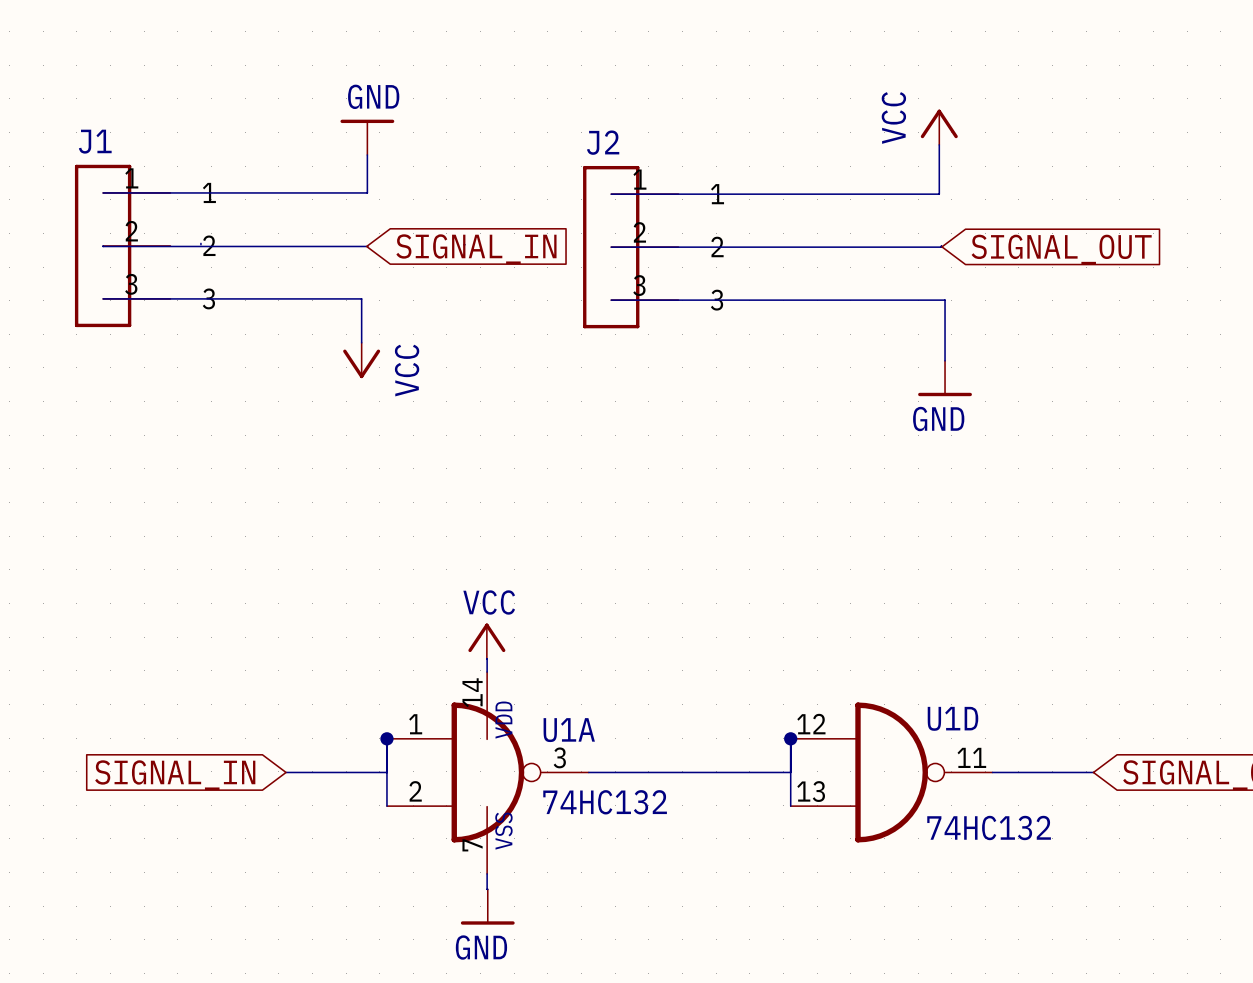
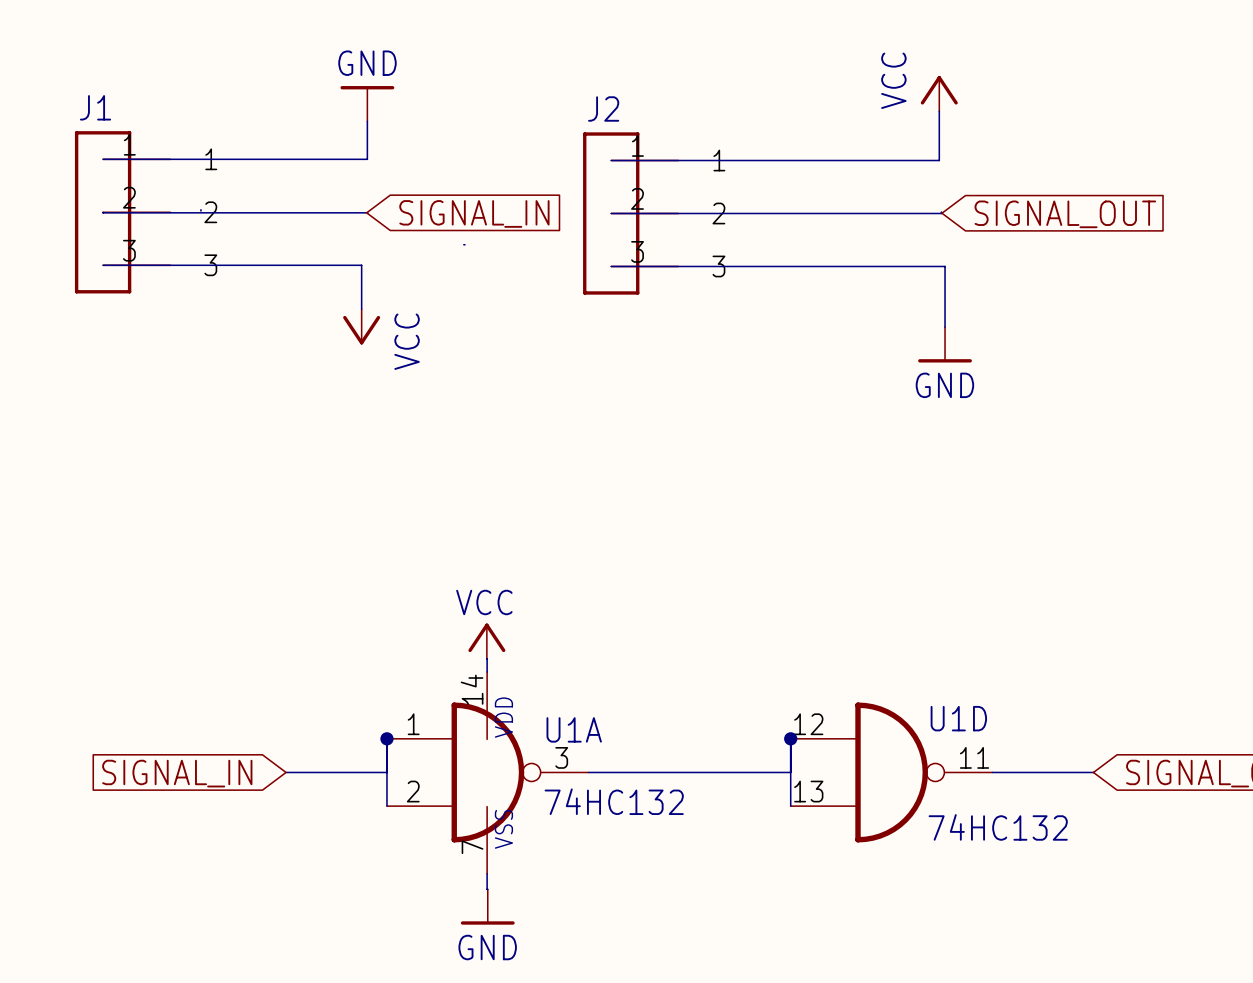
power symbol position: VCC (939, 127) -> VCC (939, 93)
power symbol position: GND (367, 137) -> GND (367, 103)
wire: (367, 159) (367, 192) (103, 192) -> (367, 159) (103, 159)
wire: (939, 160) (939, 194) (611, 194) -> (939, 160) (611, 160)
wire: (200, 243) (200, 244) -> (200, 209) (200, 210)
wire: (103, 245) (367, 246) -> (103, 212) (367, 212)
J1 position: (122, 245) -> (122, 212)
wire: (941, 245) (611, 247) -> (941, 212) (611, 213)
J2 position: (630, 247) -> (630, 213)
global label position: SIGNAL_IN (476, 249) -> SIGNAL_IN (474, 213)
global label position: SIGNAL_OUT (1061, 249) -> SIGNAL_OUT (1065, 214)
wire: (103, 298) (361, 298) -> (103, 265) (361, 265) (361, 298)
wire: (611, 300) (945, 300) -> (611, 266) (945, 266) (945, 300)
power symbol position: VCC (361, 360) -> VCC (361, 326)
power symbol position: GND (945, 378) -> GND (945, 344)

